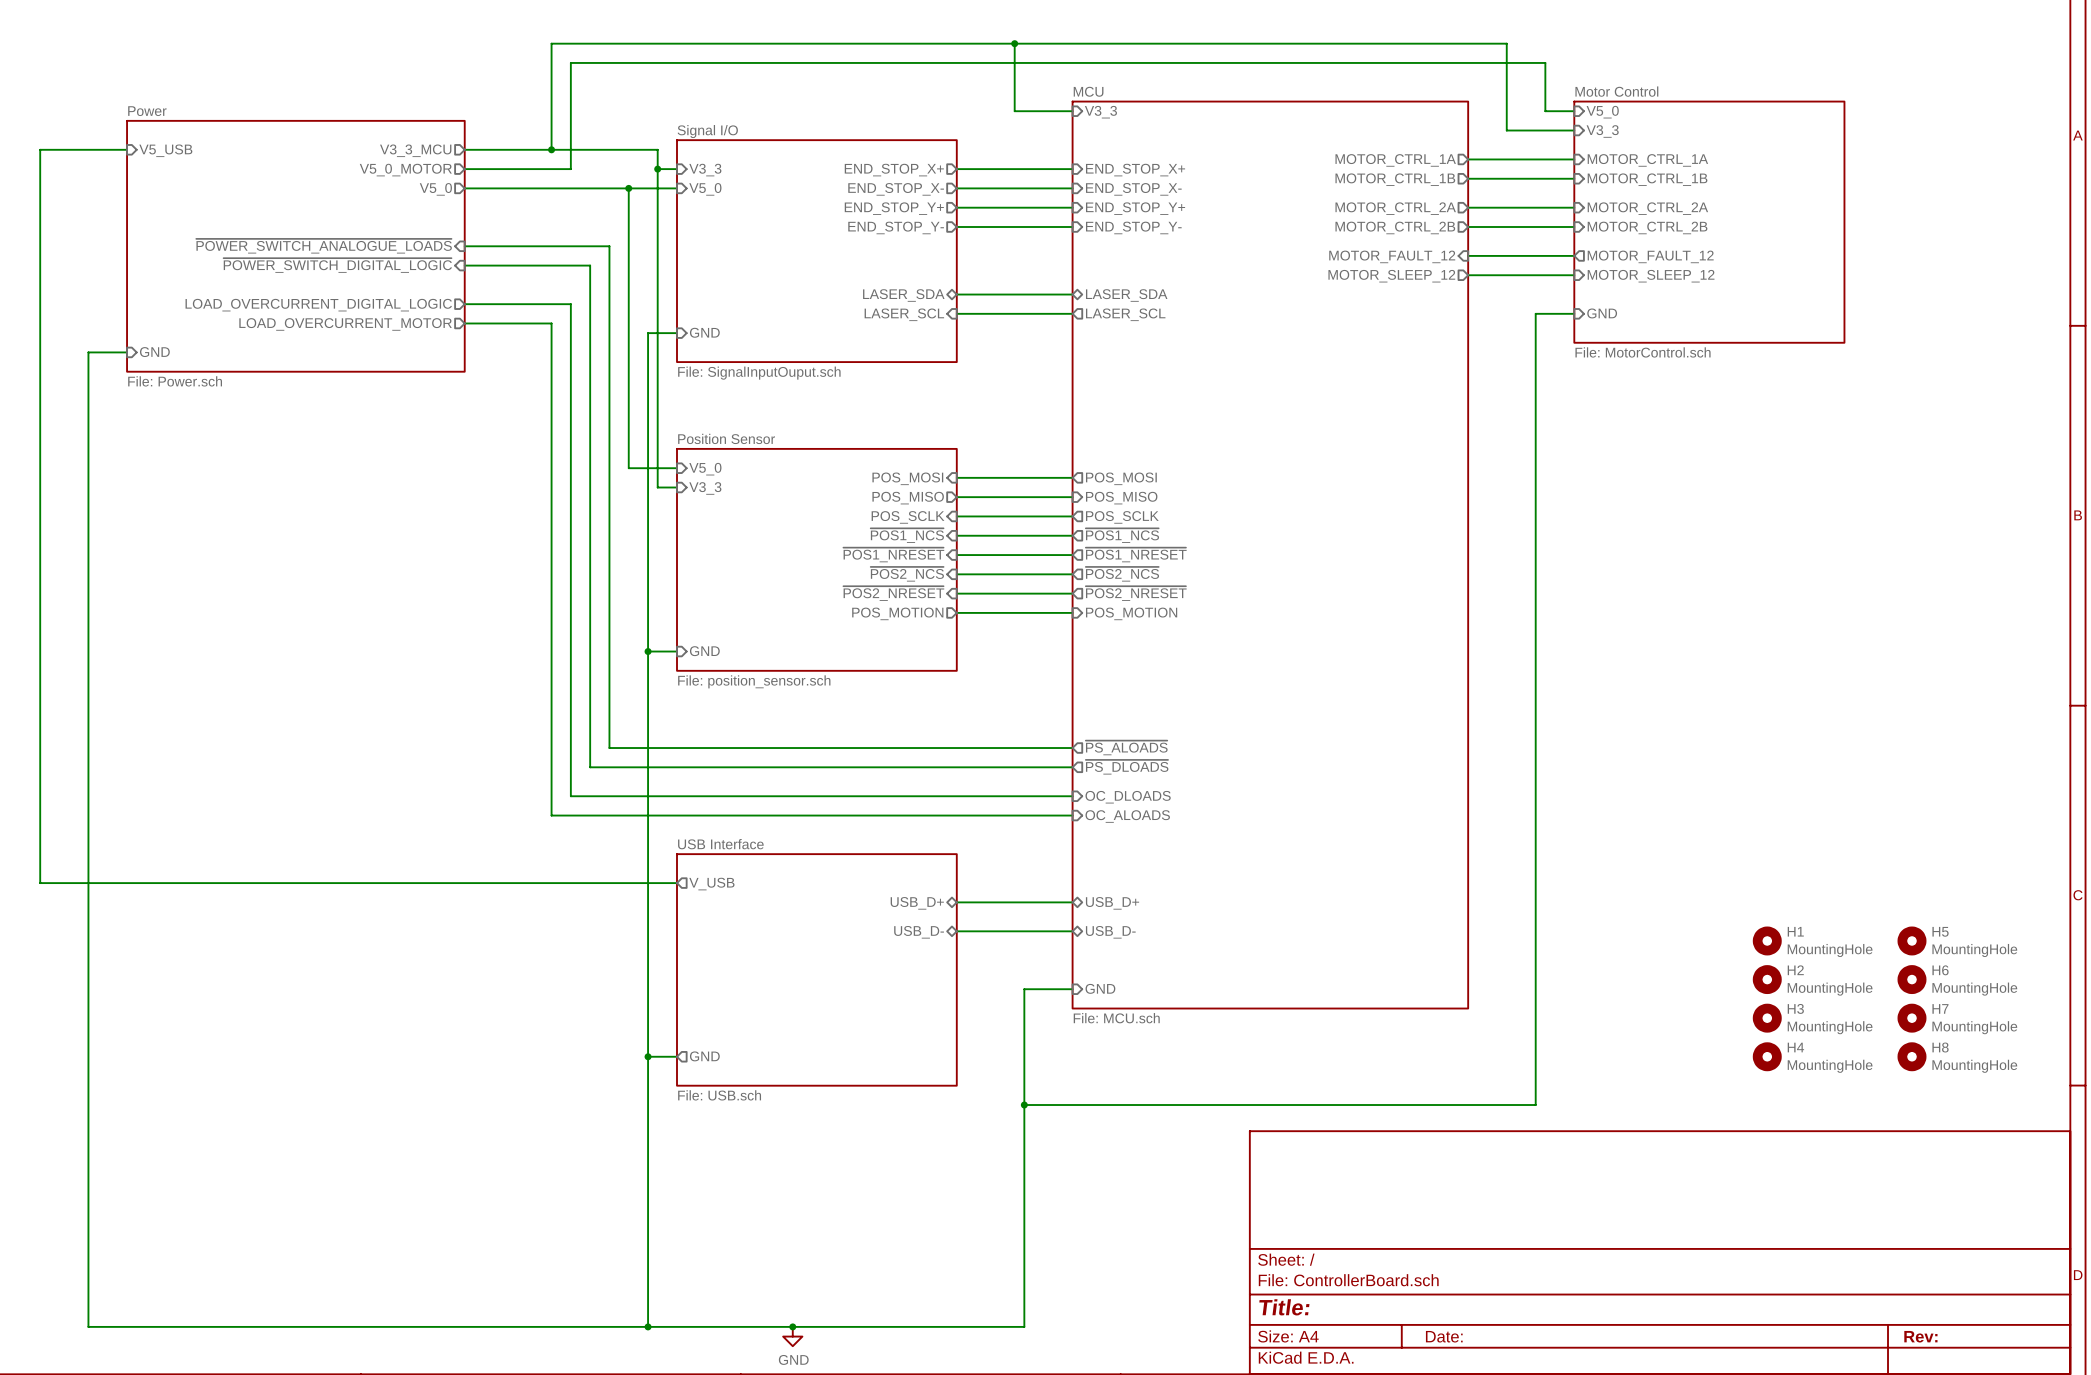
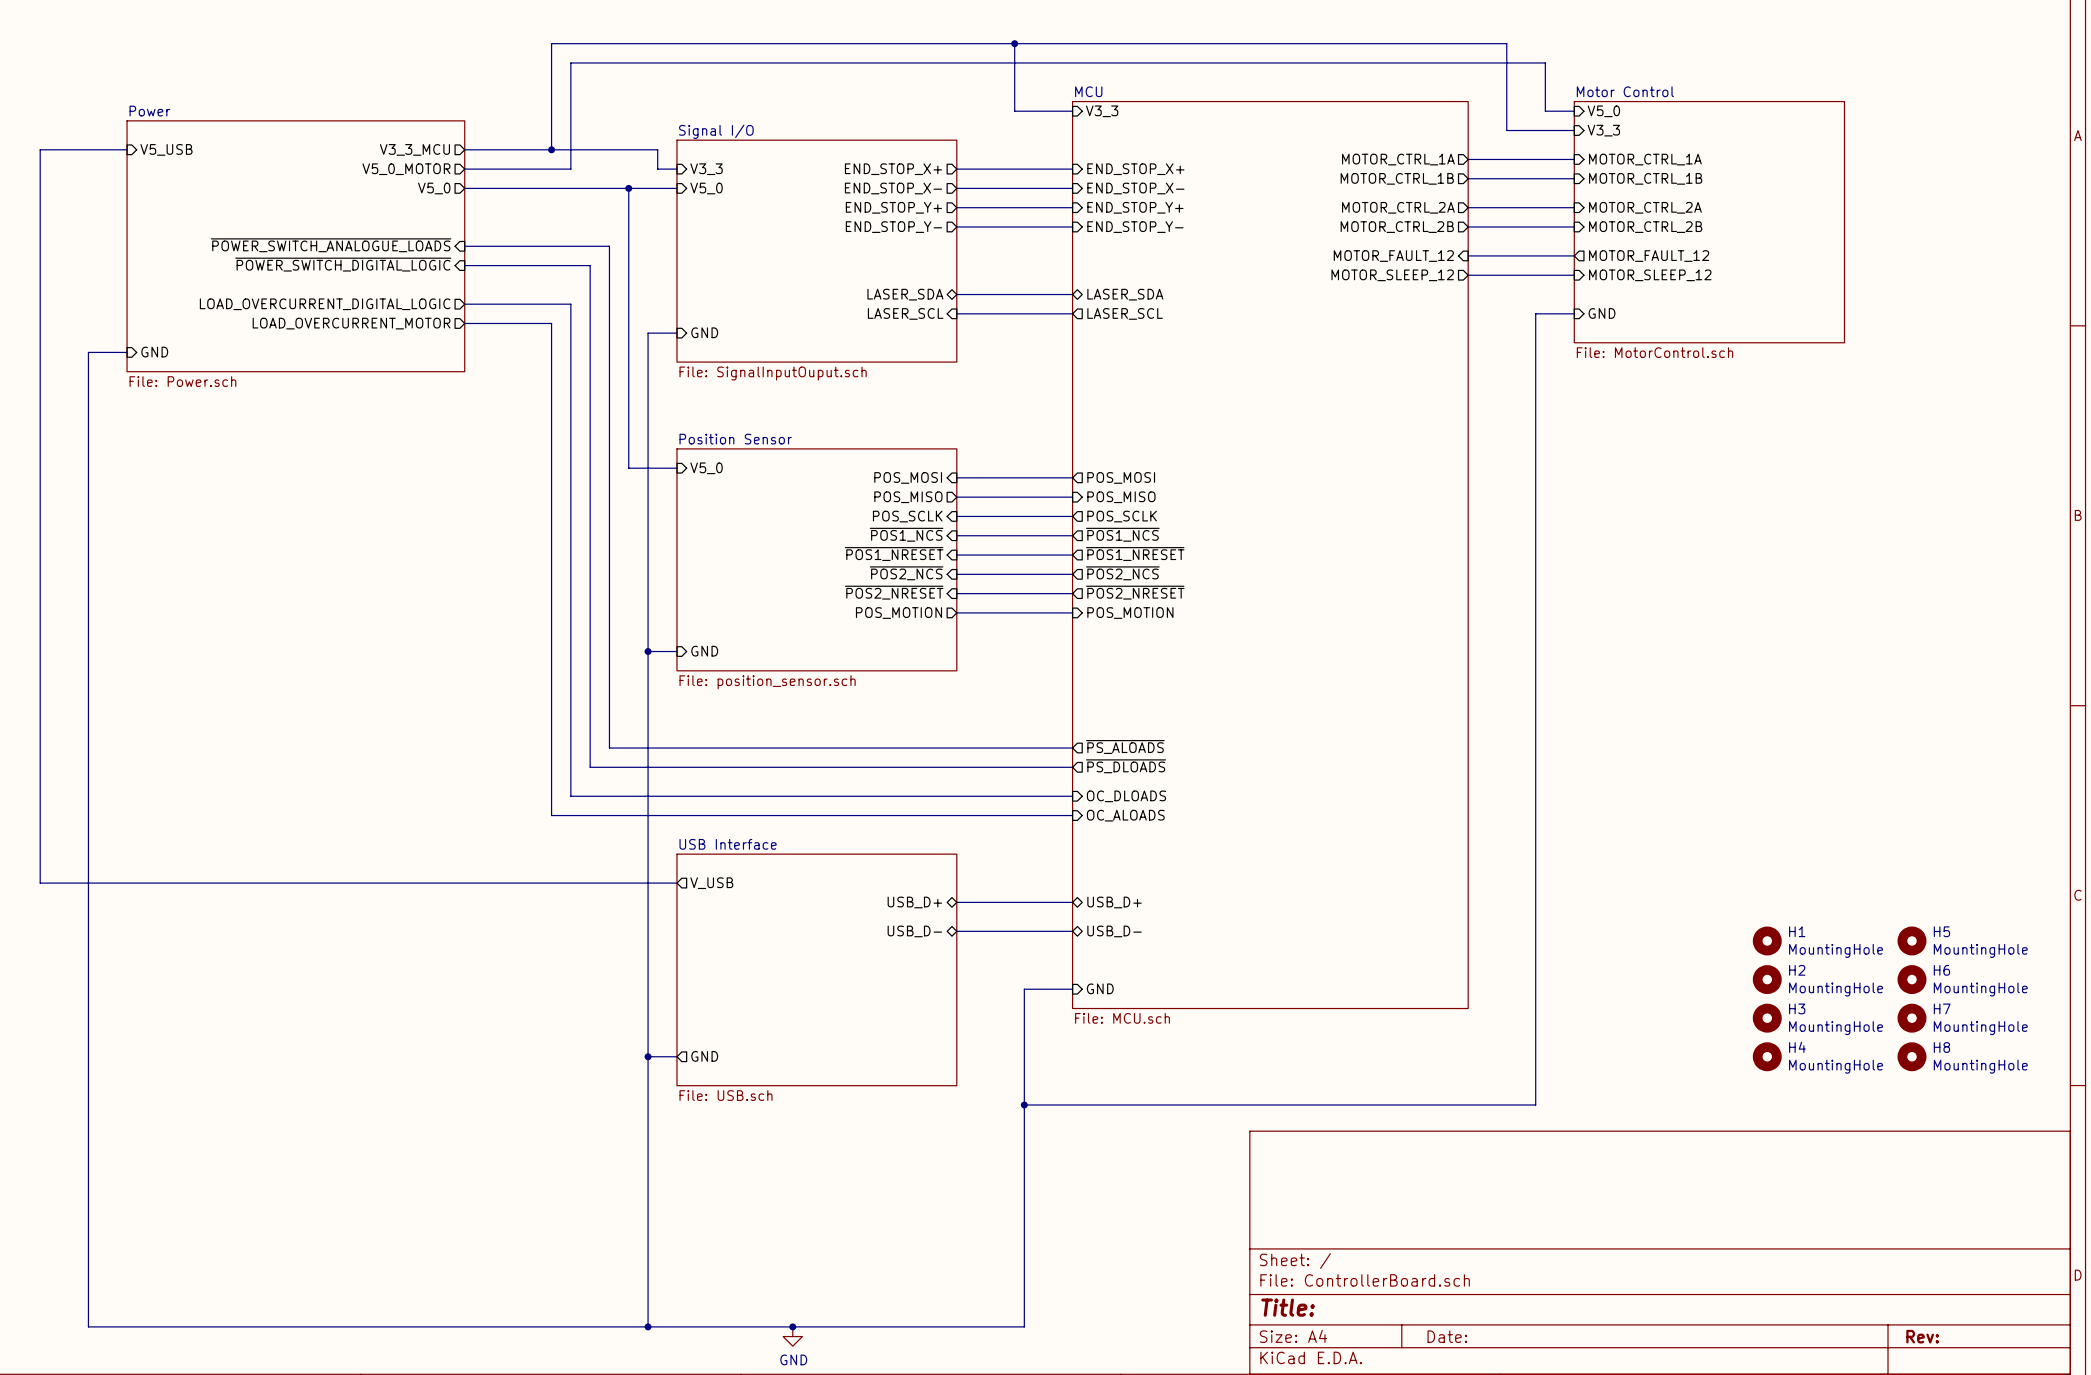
wire: (657, 169) (657, 487) (676, 487) -> none
junction: (657, 169) -> none
sheet pin: V3_3 (705, 488) -> none

